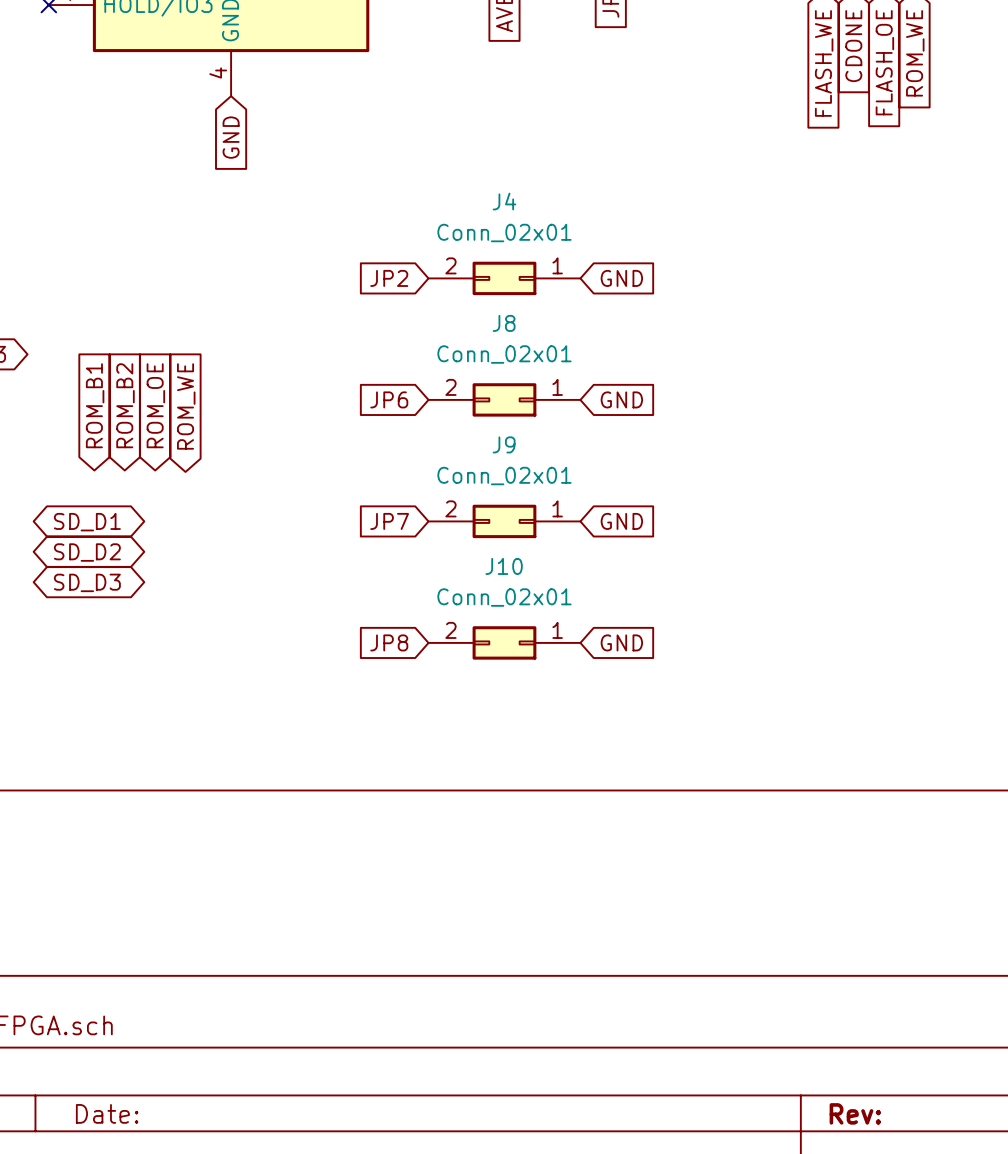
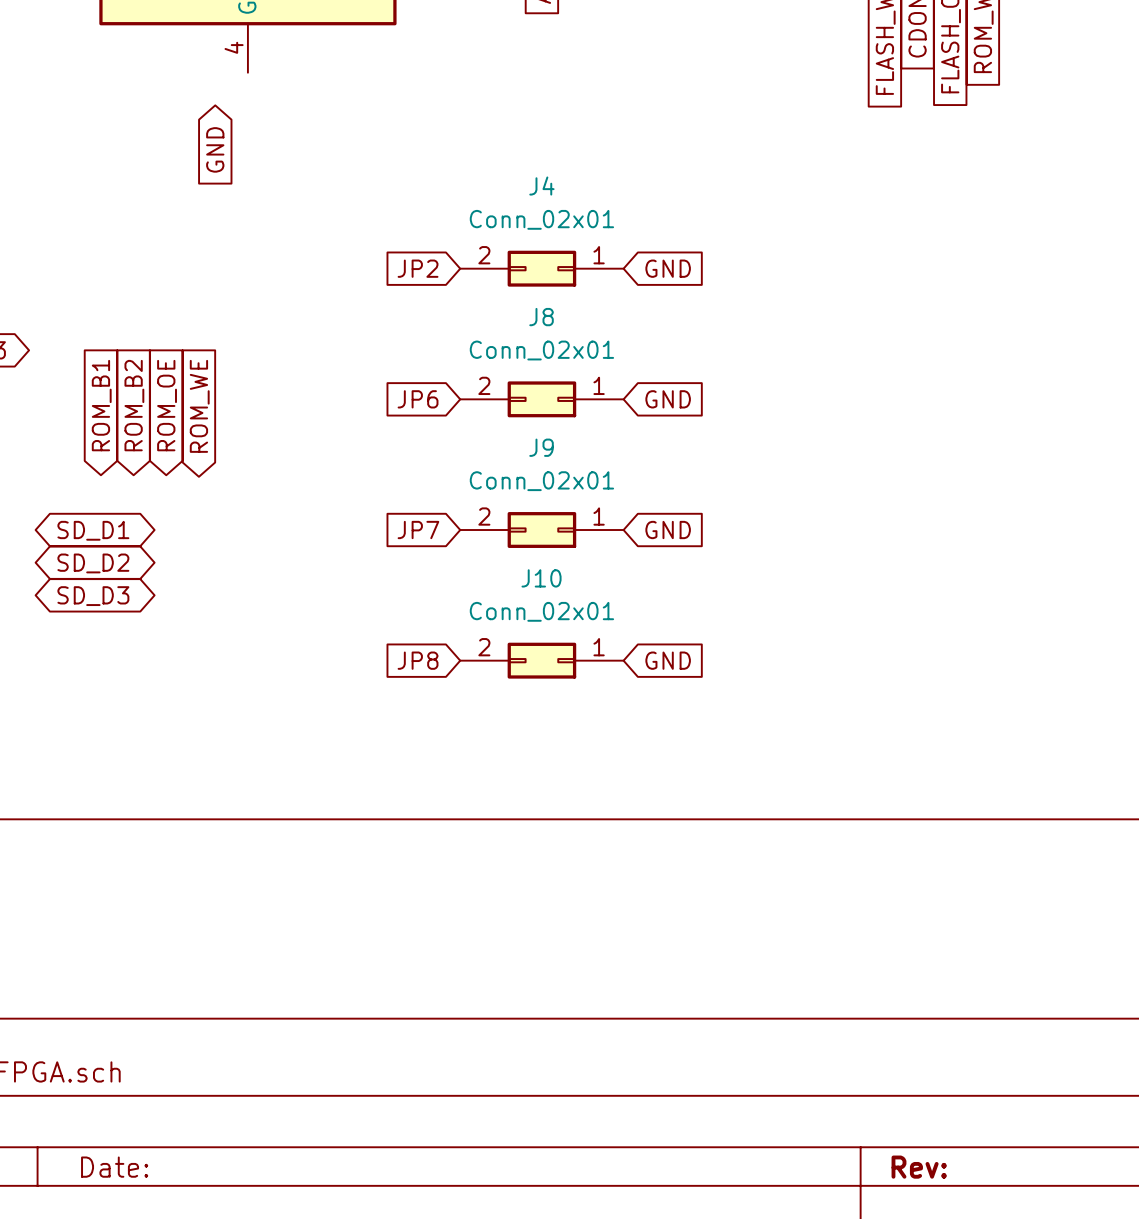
global label position: GND (231, 137) -> GND (215, 149)

